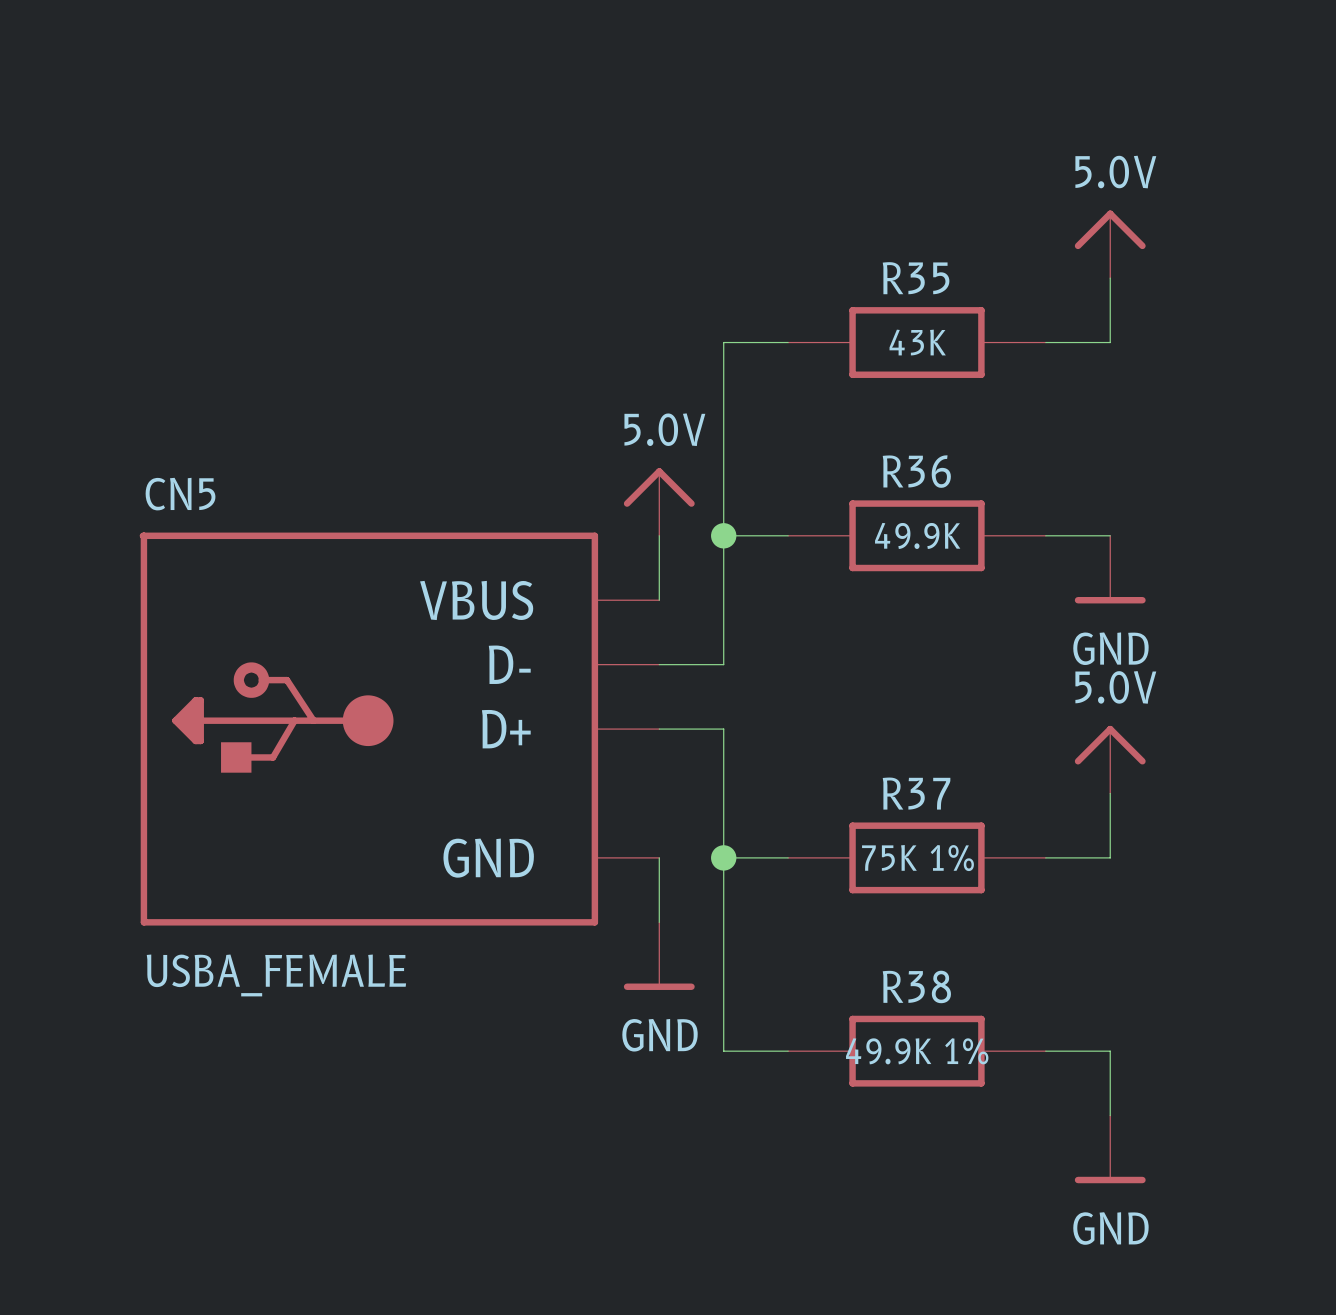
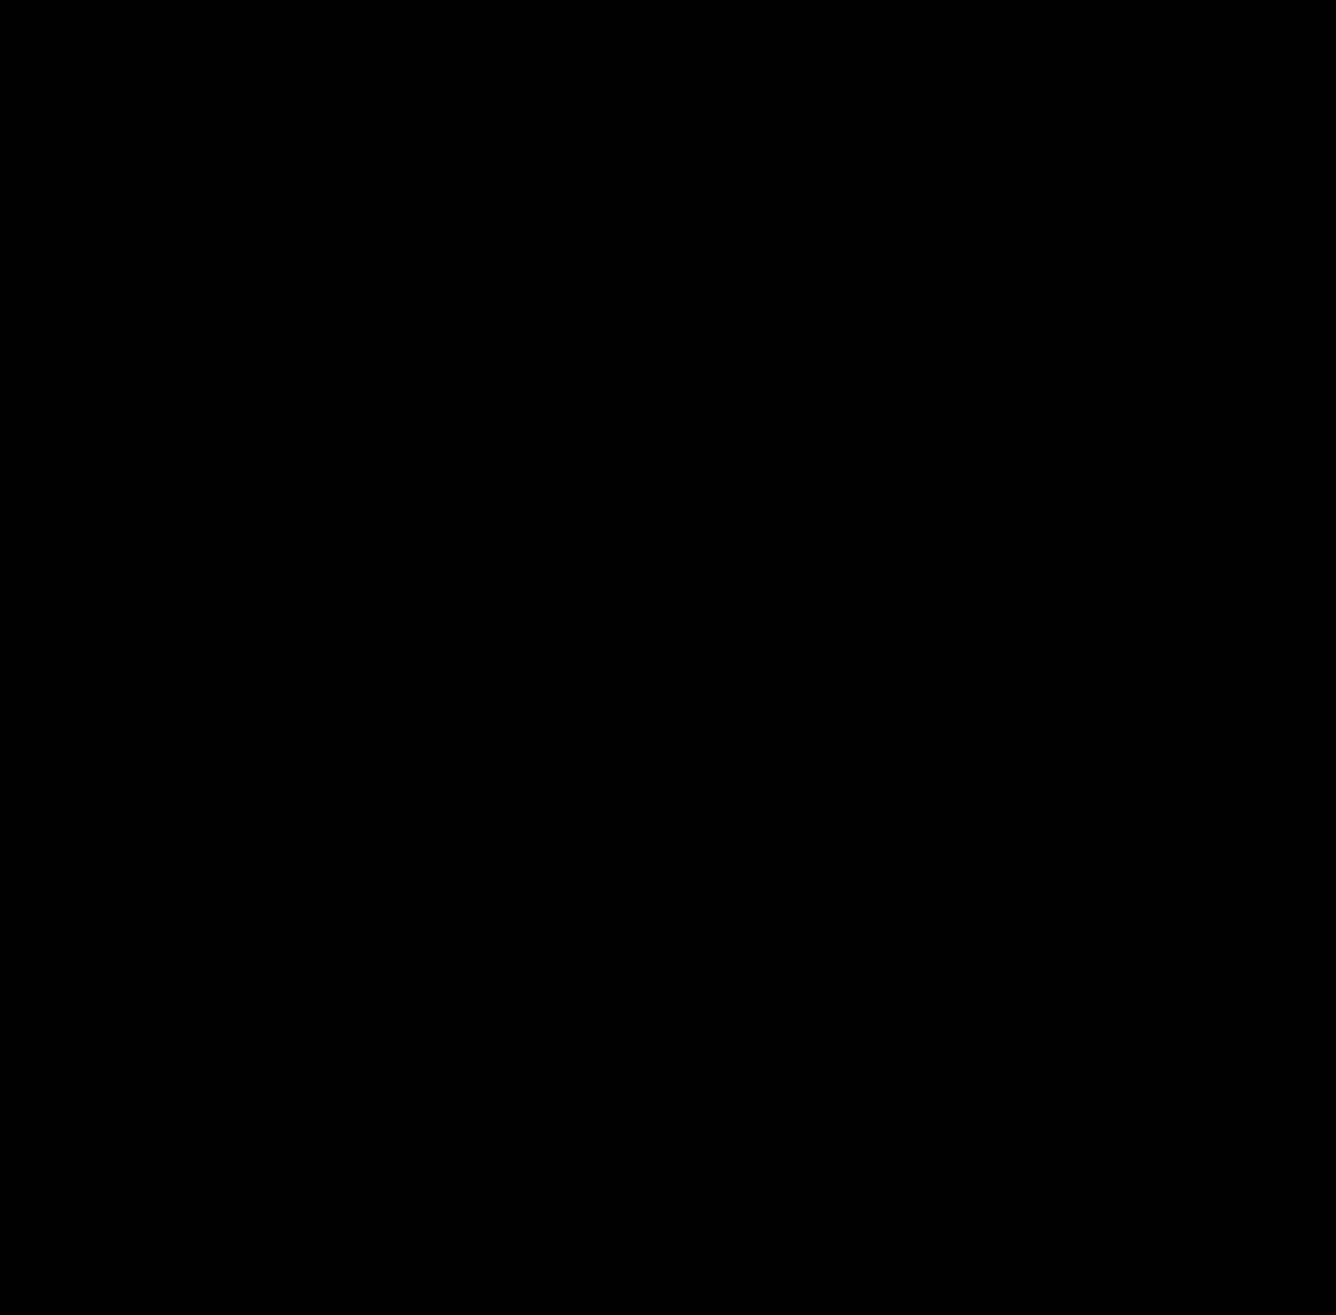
power symbol: 5.0V (1110, 244) -> none
wire: (1110, 278) (1110, 342) (1045, 342) -> none
wire: (788, 342) (723, 342) (723, 664) (659, 664) -> none
R35: 43K (916, 342) -> none
power symbol: 5.0V (659, 501) -> none
wire: (659, 535) (659, 600) -> none
wire: (723, 535) (788, 535) -> none
junction: (723, 535) -> none
R36: 49.9K (916, 535) -> none
wire: (1045, 535) (1110, 535) -> none
power symbol: GND (1110, 569) -> none
CN5: USBA_FEMALE (399, 729) -> none
wire: (659, 729) (723, 729) (723, 1051) (788, 1051) -> none
power symbol: 5.0V (1110, 759) -> none
wire: (1110, 793) (1110, 857) (1045, 857) -> none
wire: (659, 857) (659, 922) -> none
wire: (723, 857) (788, 857) -> none
junction: (723, 857) -> none
R37: 75K 1% (916, 857) -> none
power symbol: GND (659, 956) -> none
R38: 49.9K 1% (916, 1051) -> none
wire: (1045, 1051) (1110, 1051) (1110, 1115) -> none
power symbol: GND (1110, 1149) -> none

